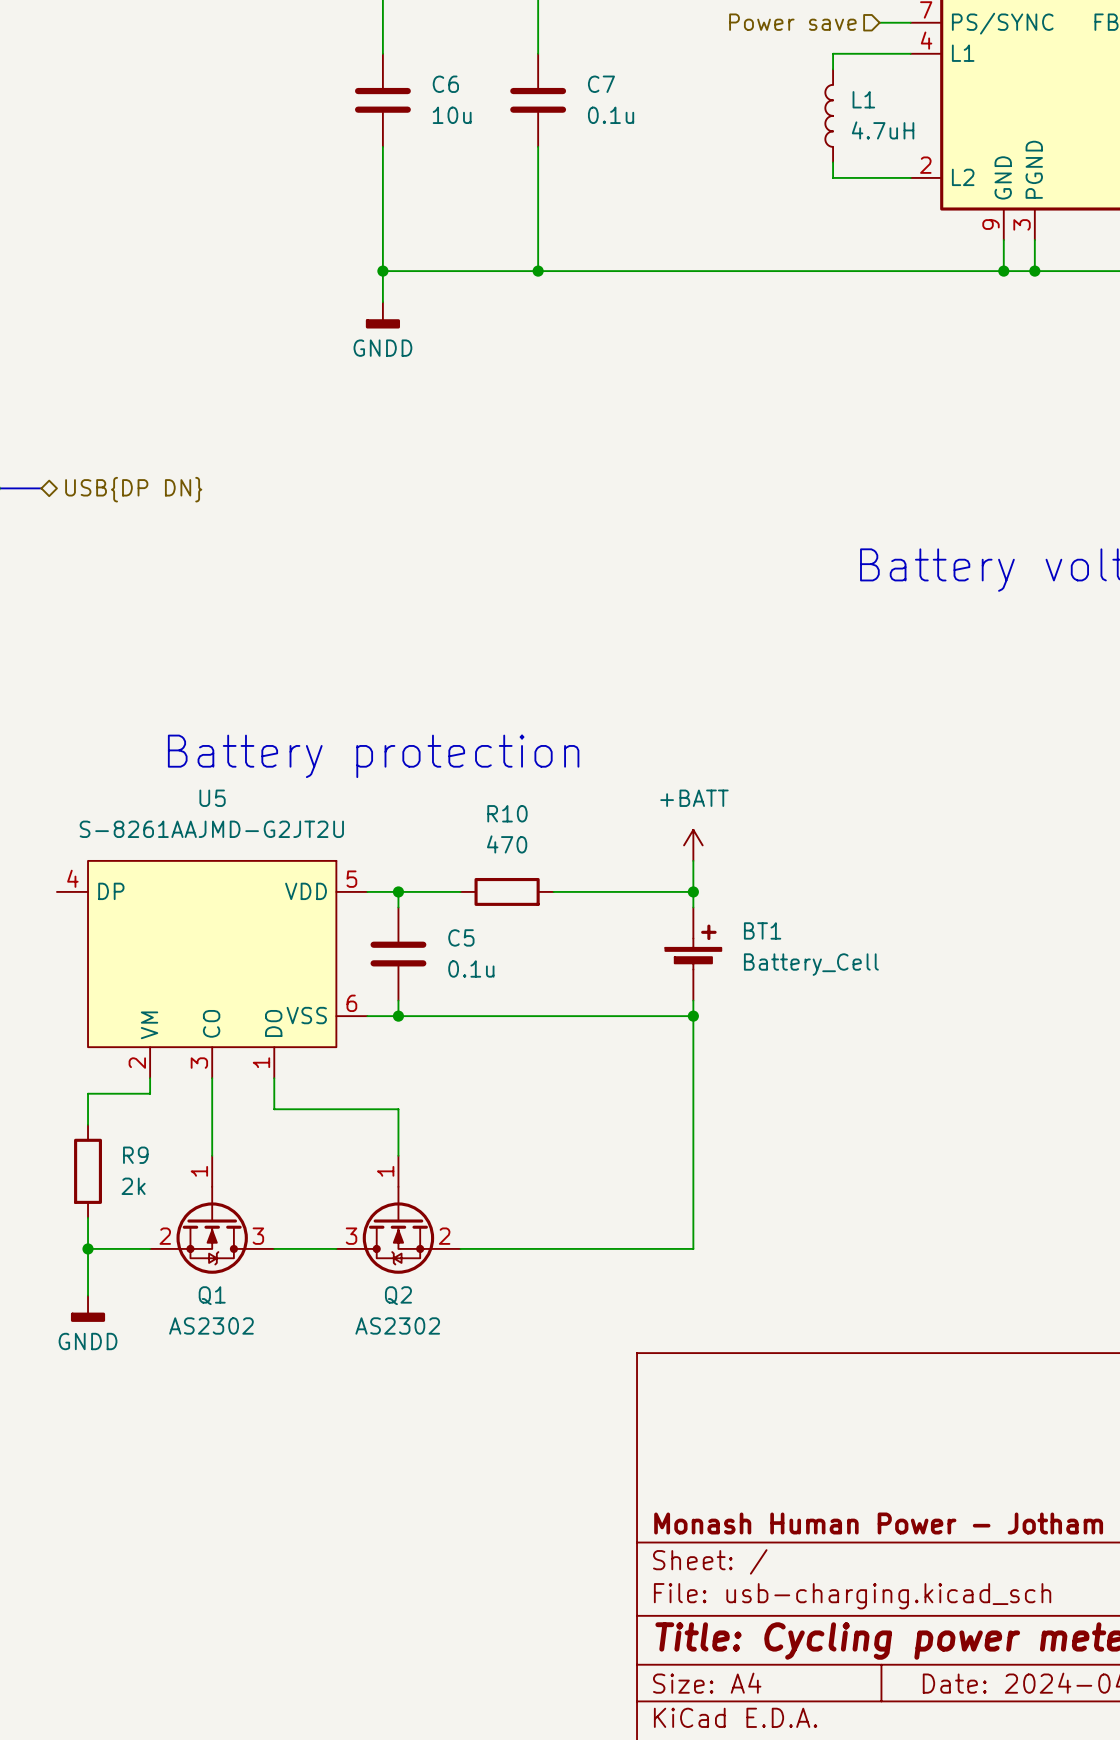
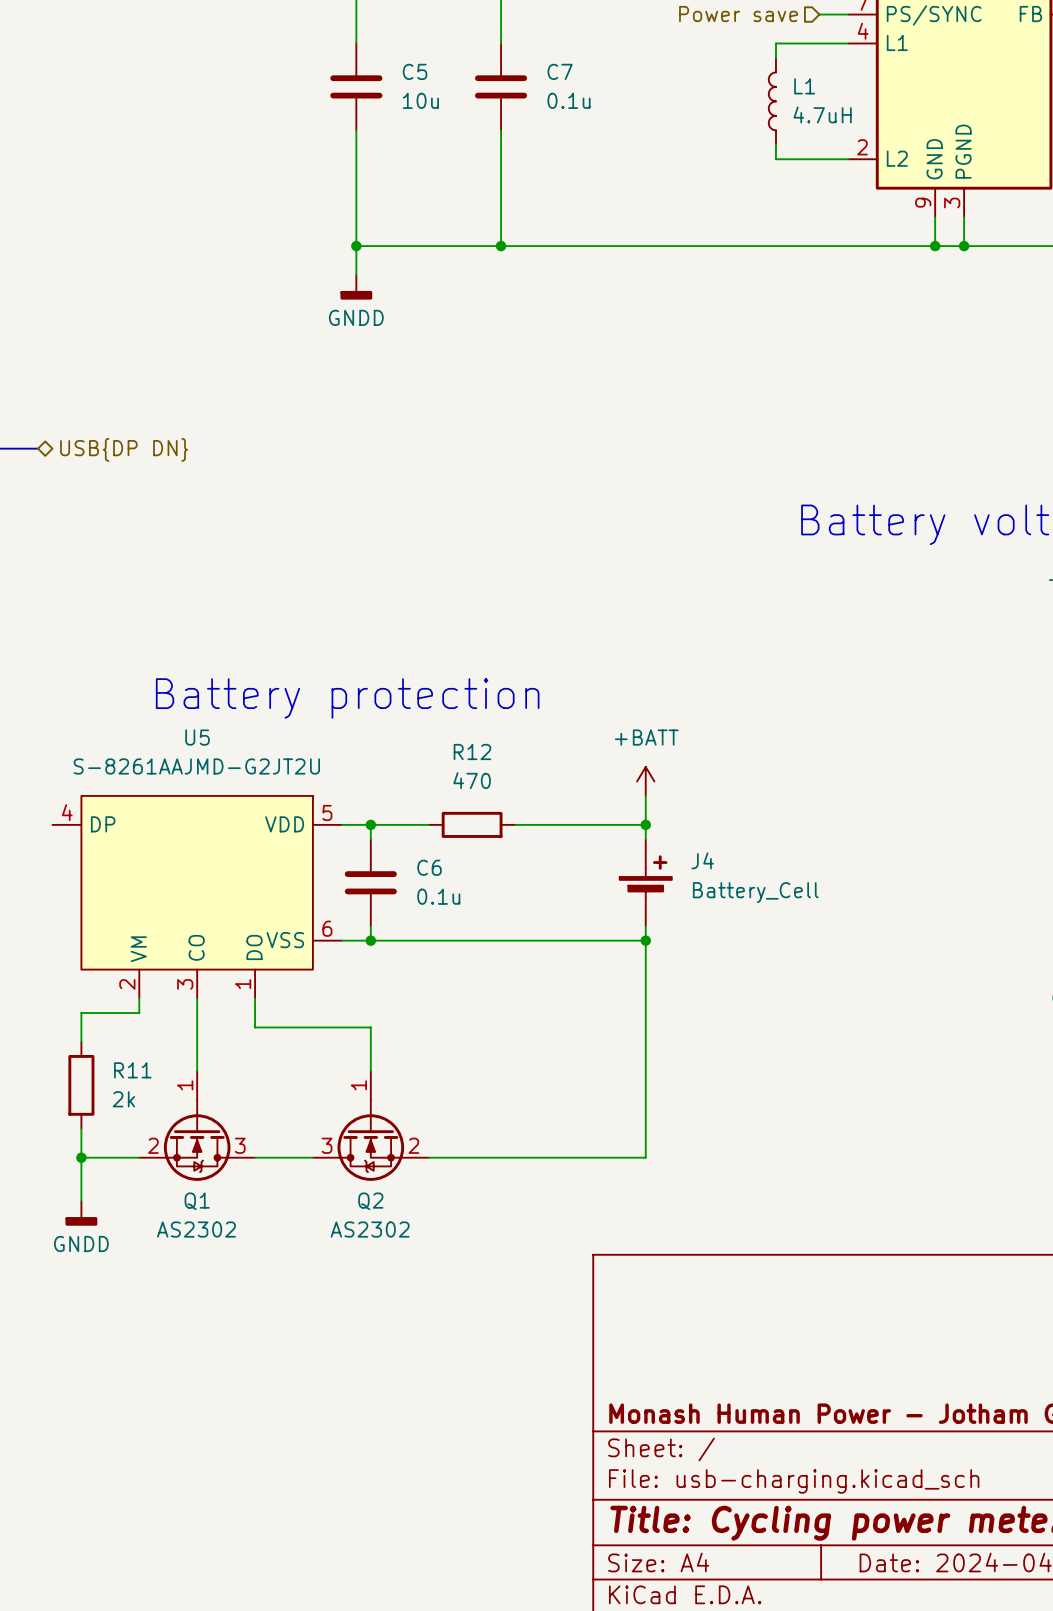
C6 name: C6 (445, 84) -> C5 (415, 71)
R10 name: R10 (507, 813) -> R12 (472, 752)
BT1 name: BT1 (762, 930) -> J4 (702, 860)
C5 name: C5 (461, 937) -> C6 (429, 867)
R9 name: R9 (135, 1155) -> R11 (132, 1070)

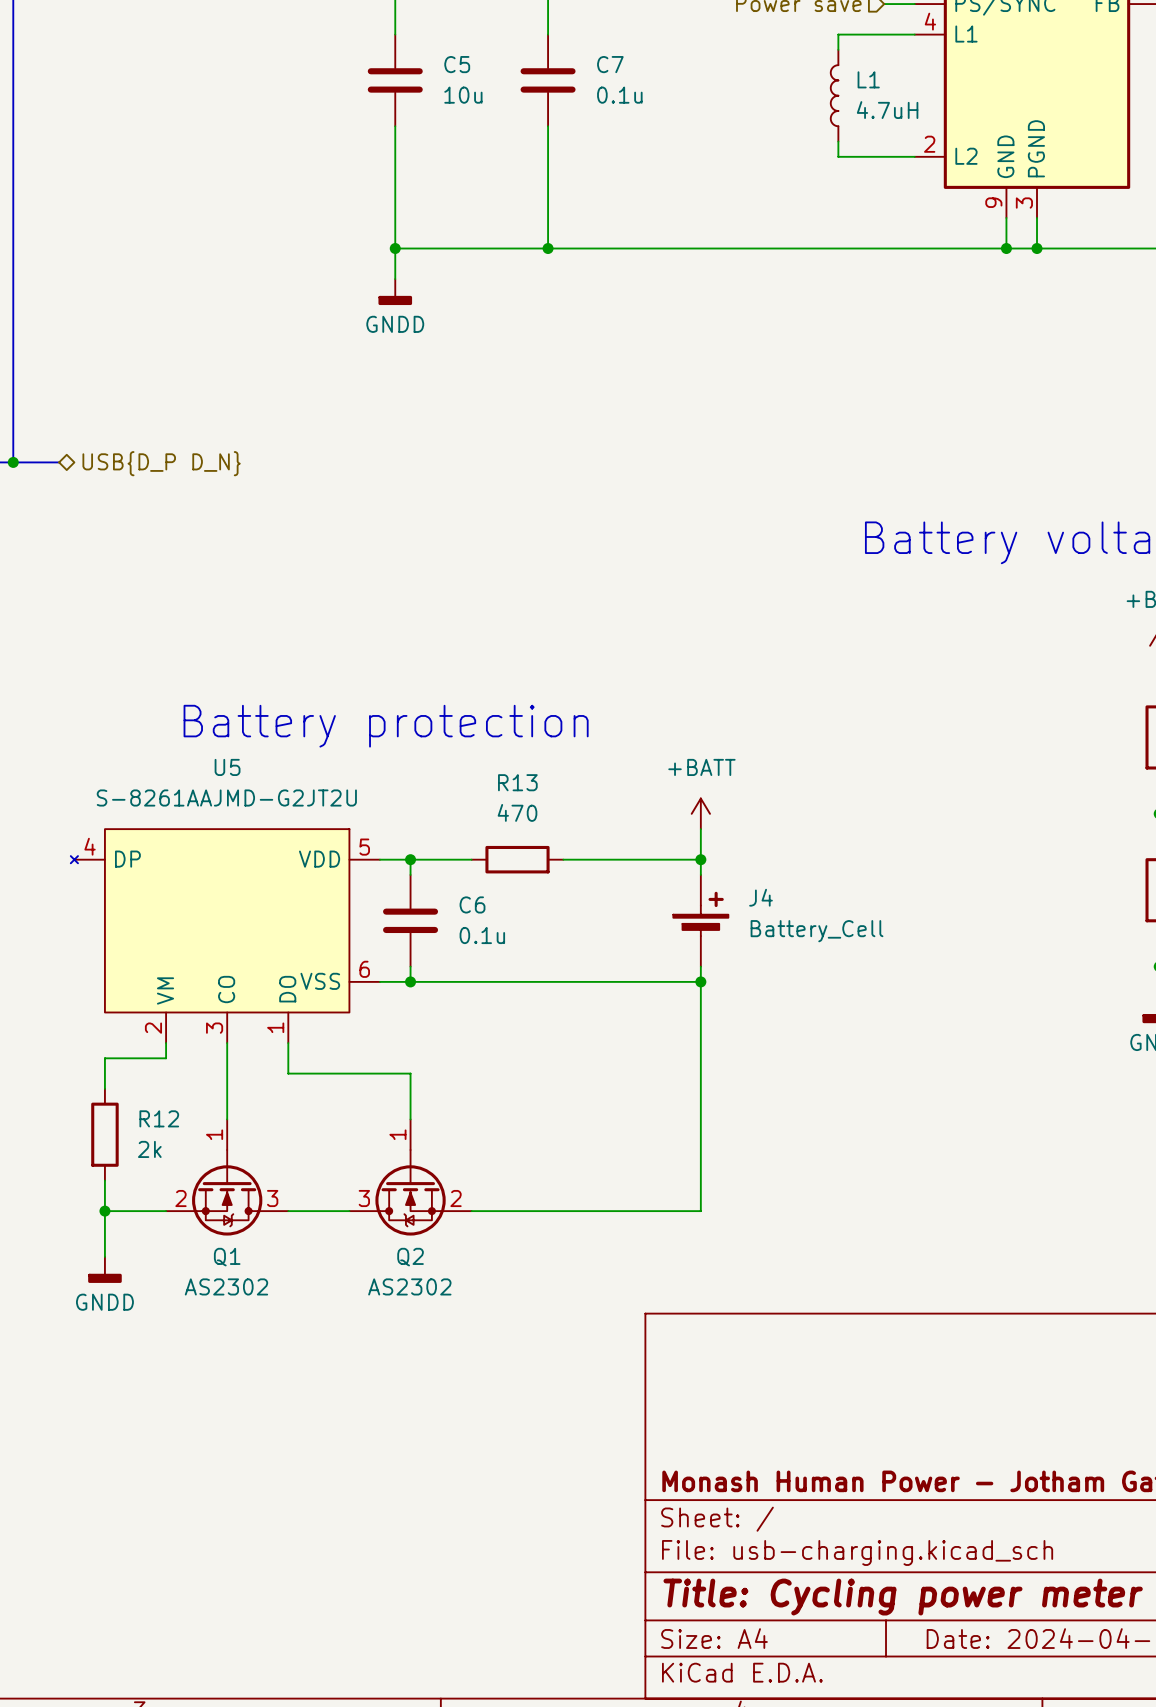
hierarchical label: USB{DP DN} (124, 449) -> USB{D_P D_N} (161, 463)
R12 name: R12 (472, 752) -> R13 (517, 782)
U5 symbol: [52, 795, 342, 999] -> [70, 829, 380, 1044]
R11 name: R11 (132, 1070) -> R12 (159, 1118)

